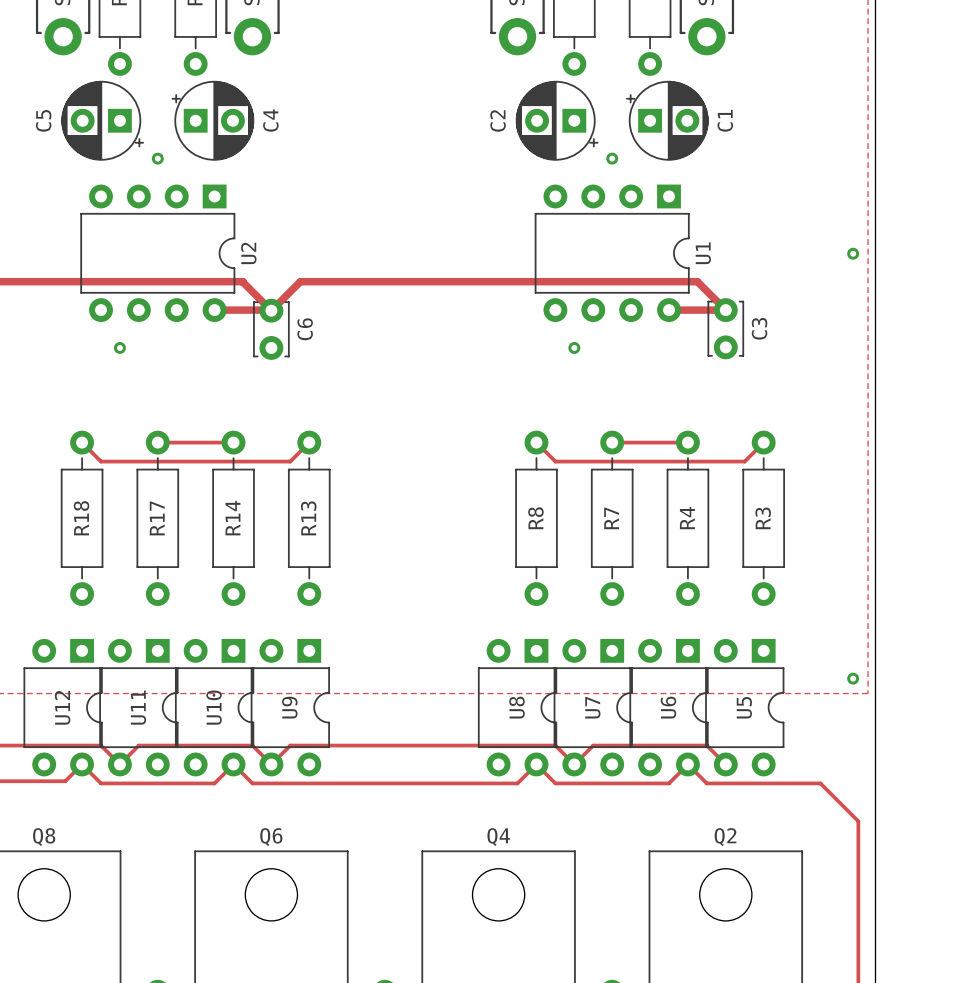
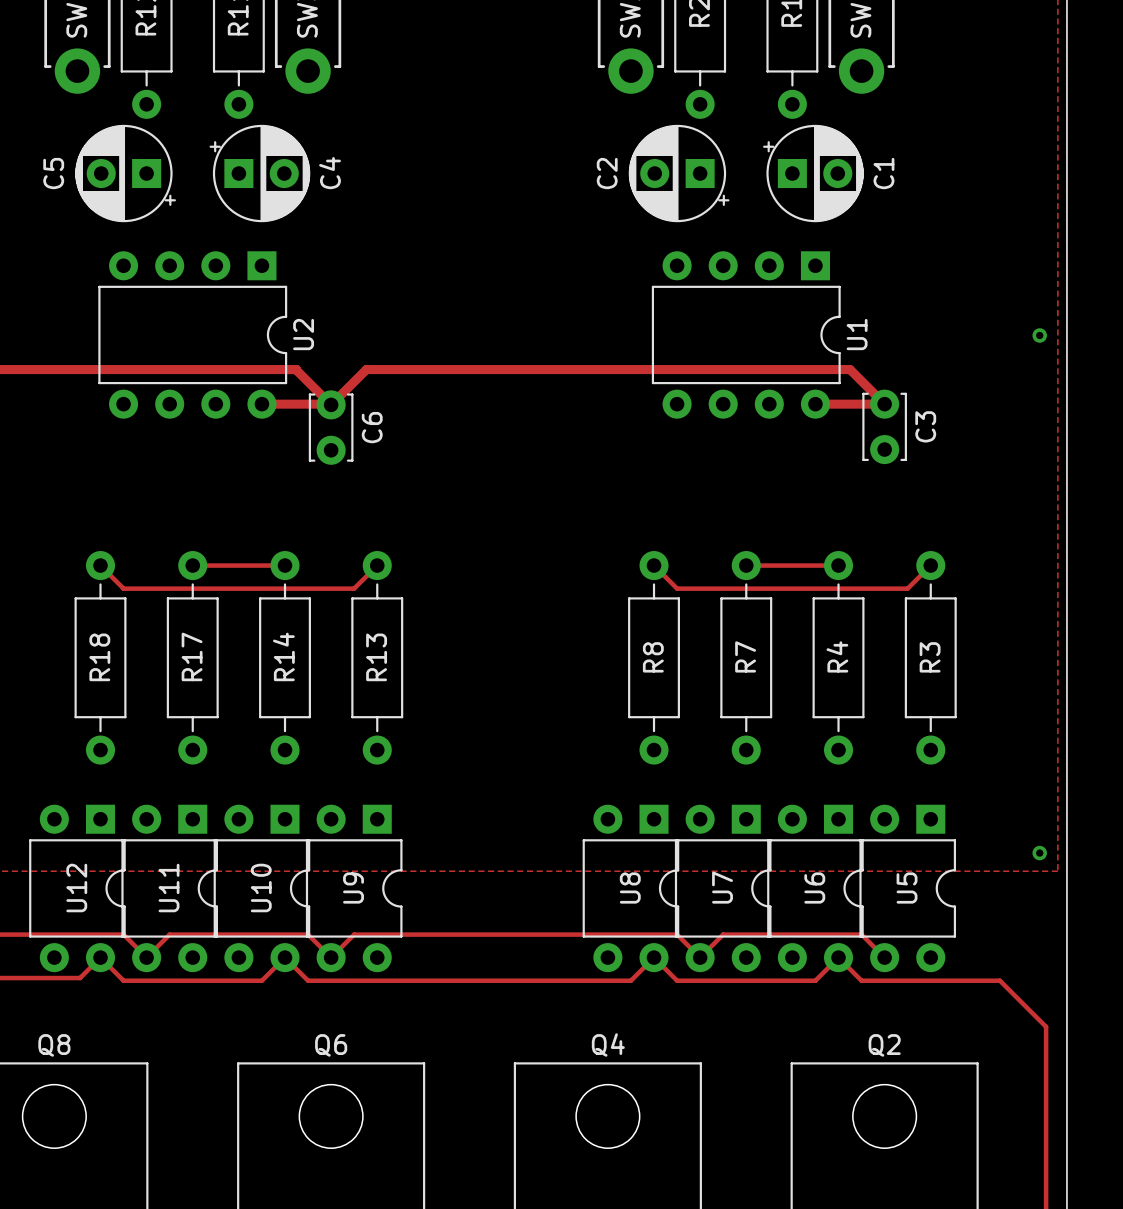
via: (157, 158) -> none
via: (612, 158) -> none
via: (119, 347) -> none
via: (574, 347) -> none

